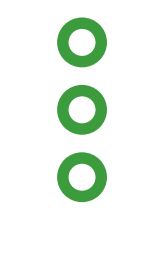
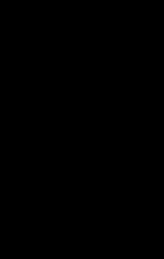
part: (82, 109) -> none

